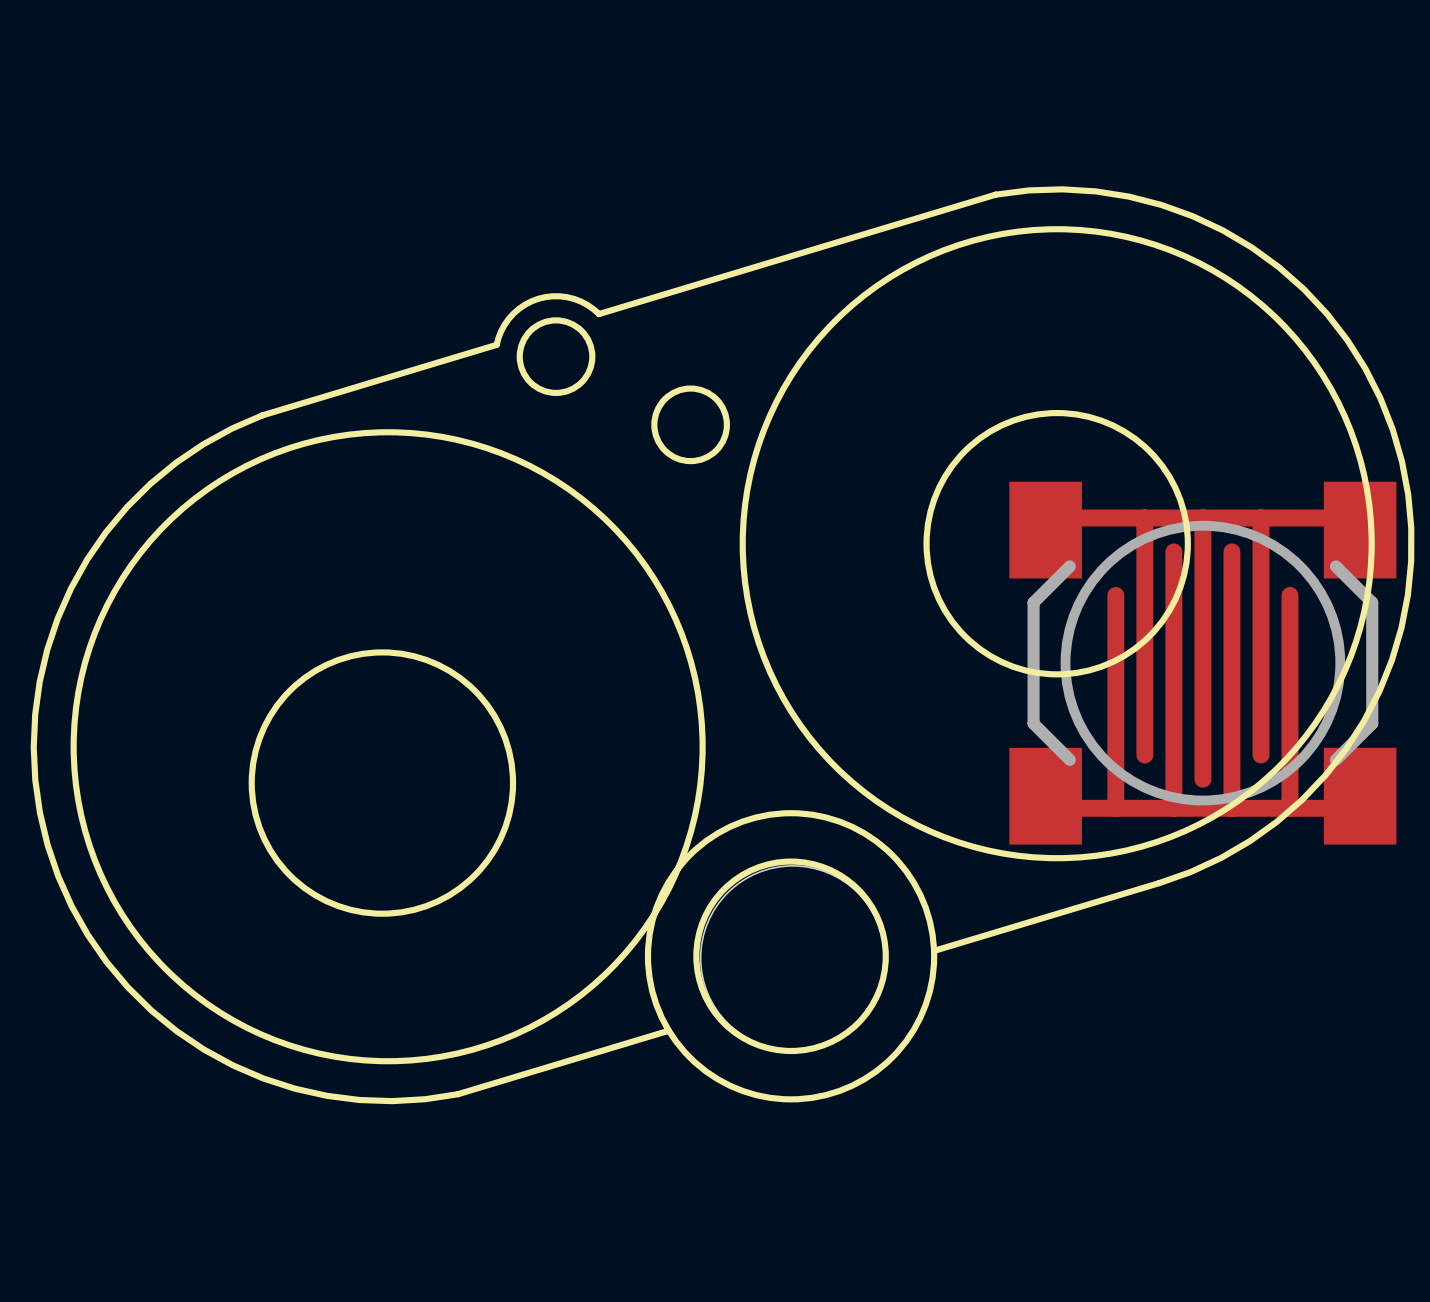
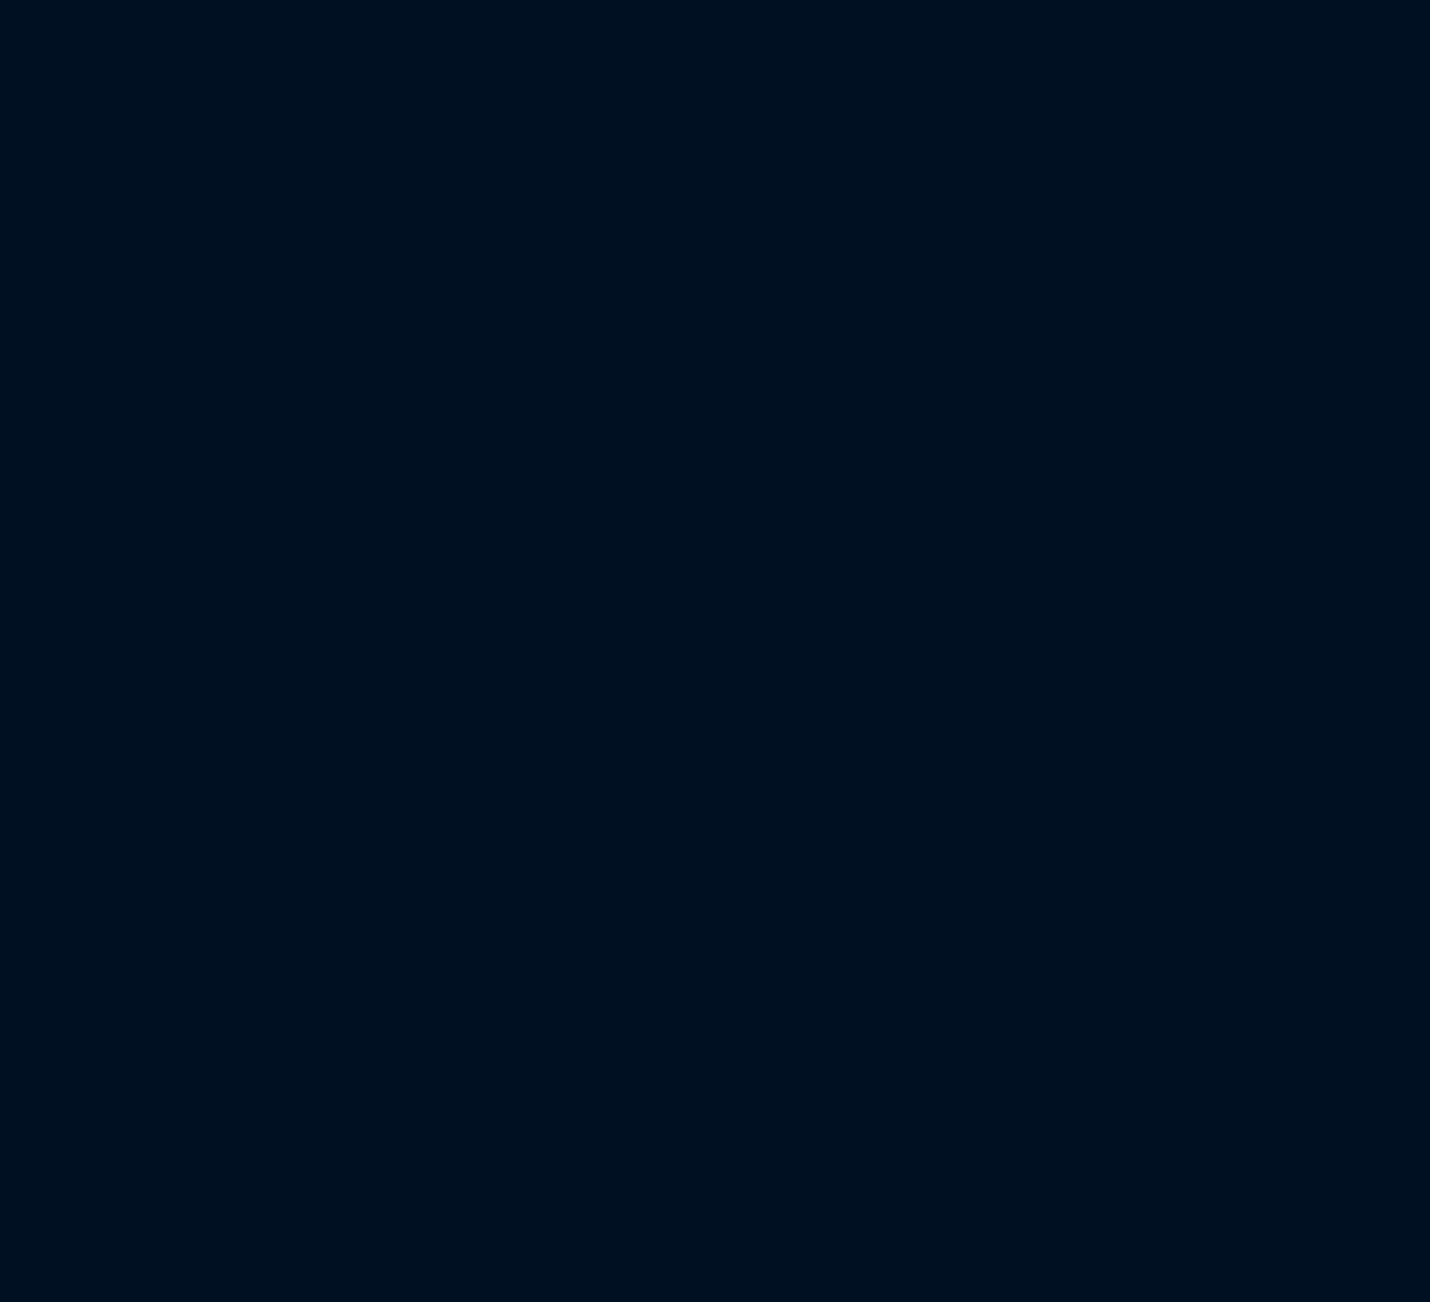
part: (722, 645) -> none
part: (1202, 663) -> none

